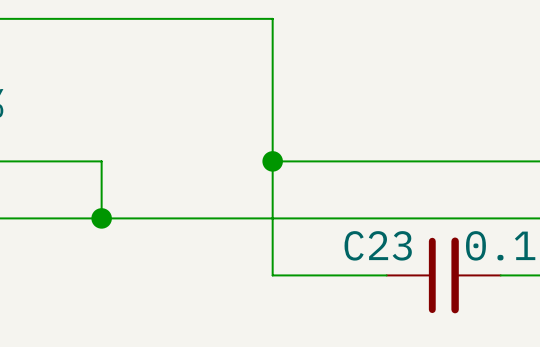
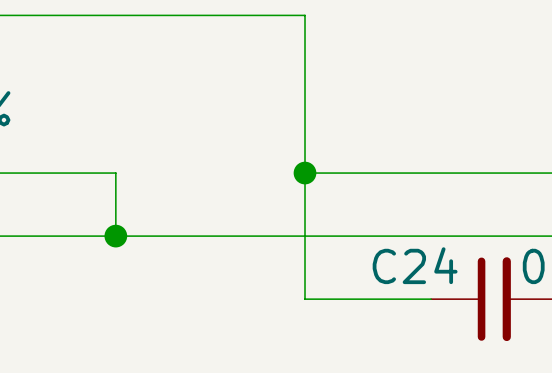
C23 name: C23 (378, 245) -> C24 (415, 265)

